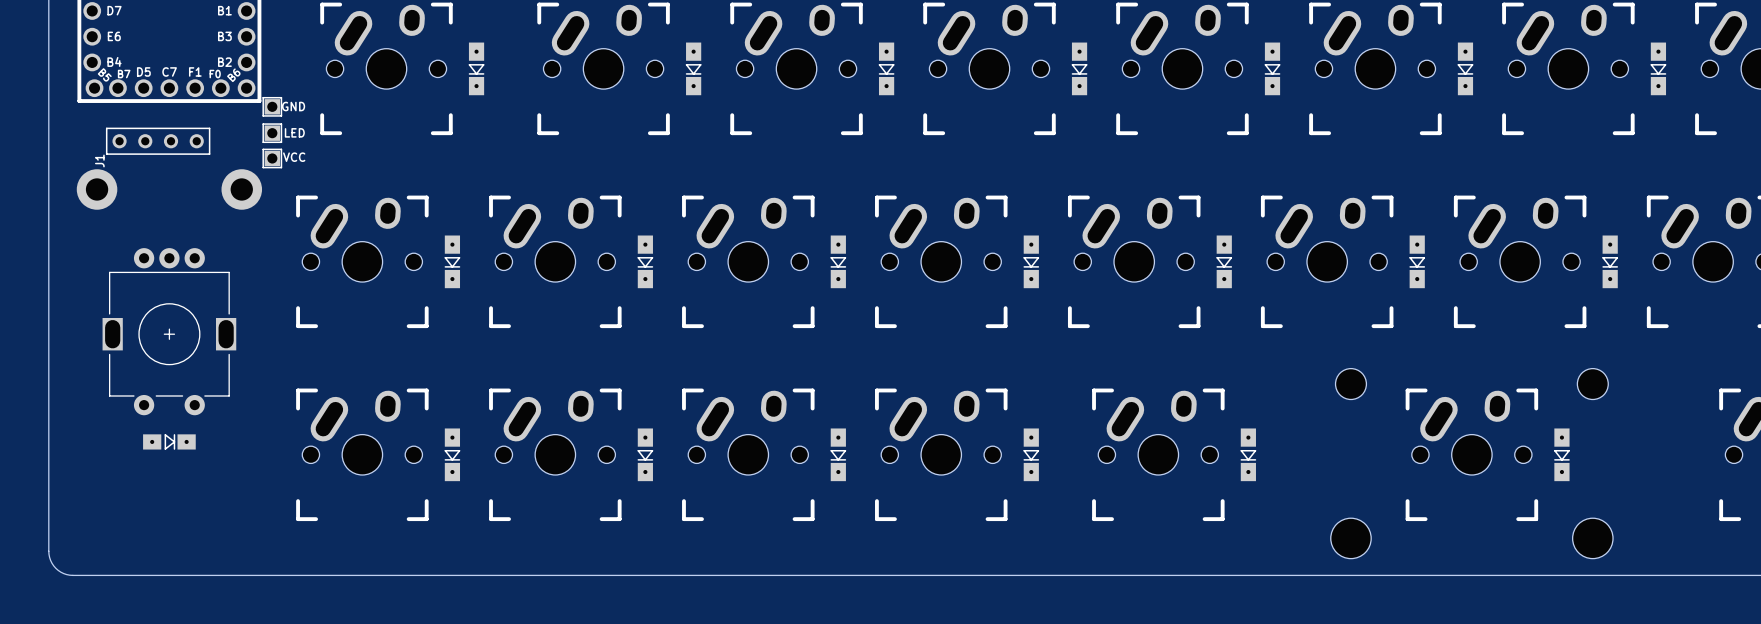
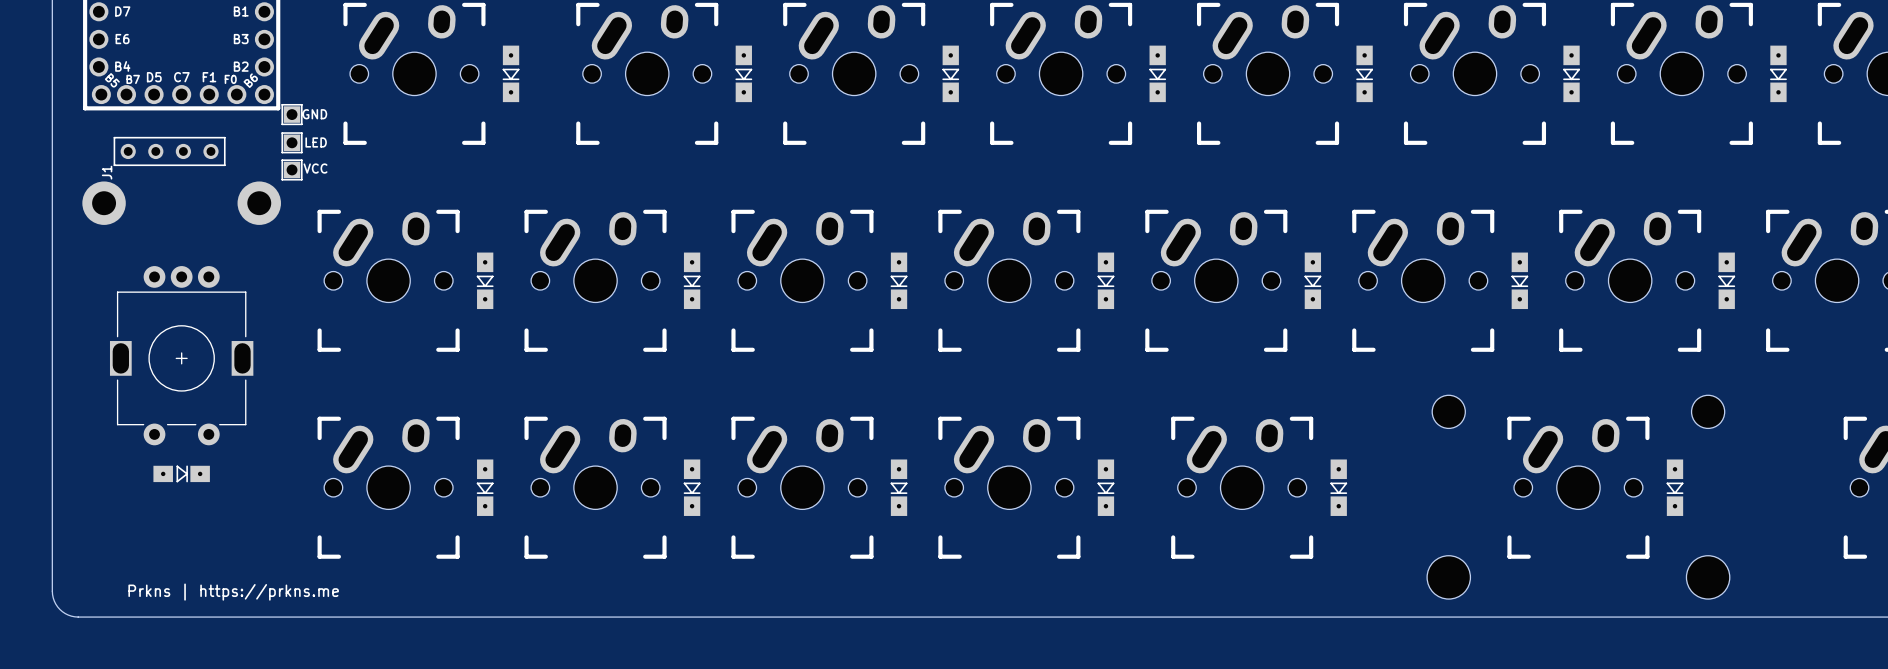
text: none -> Prkns | https://prkns.me (233, 592)

